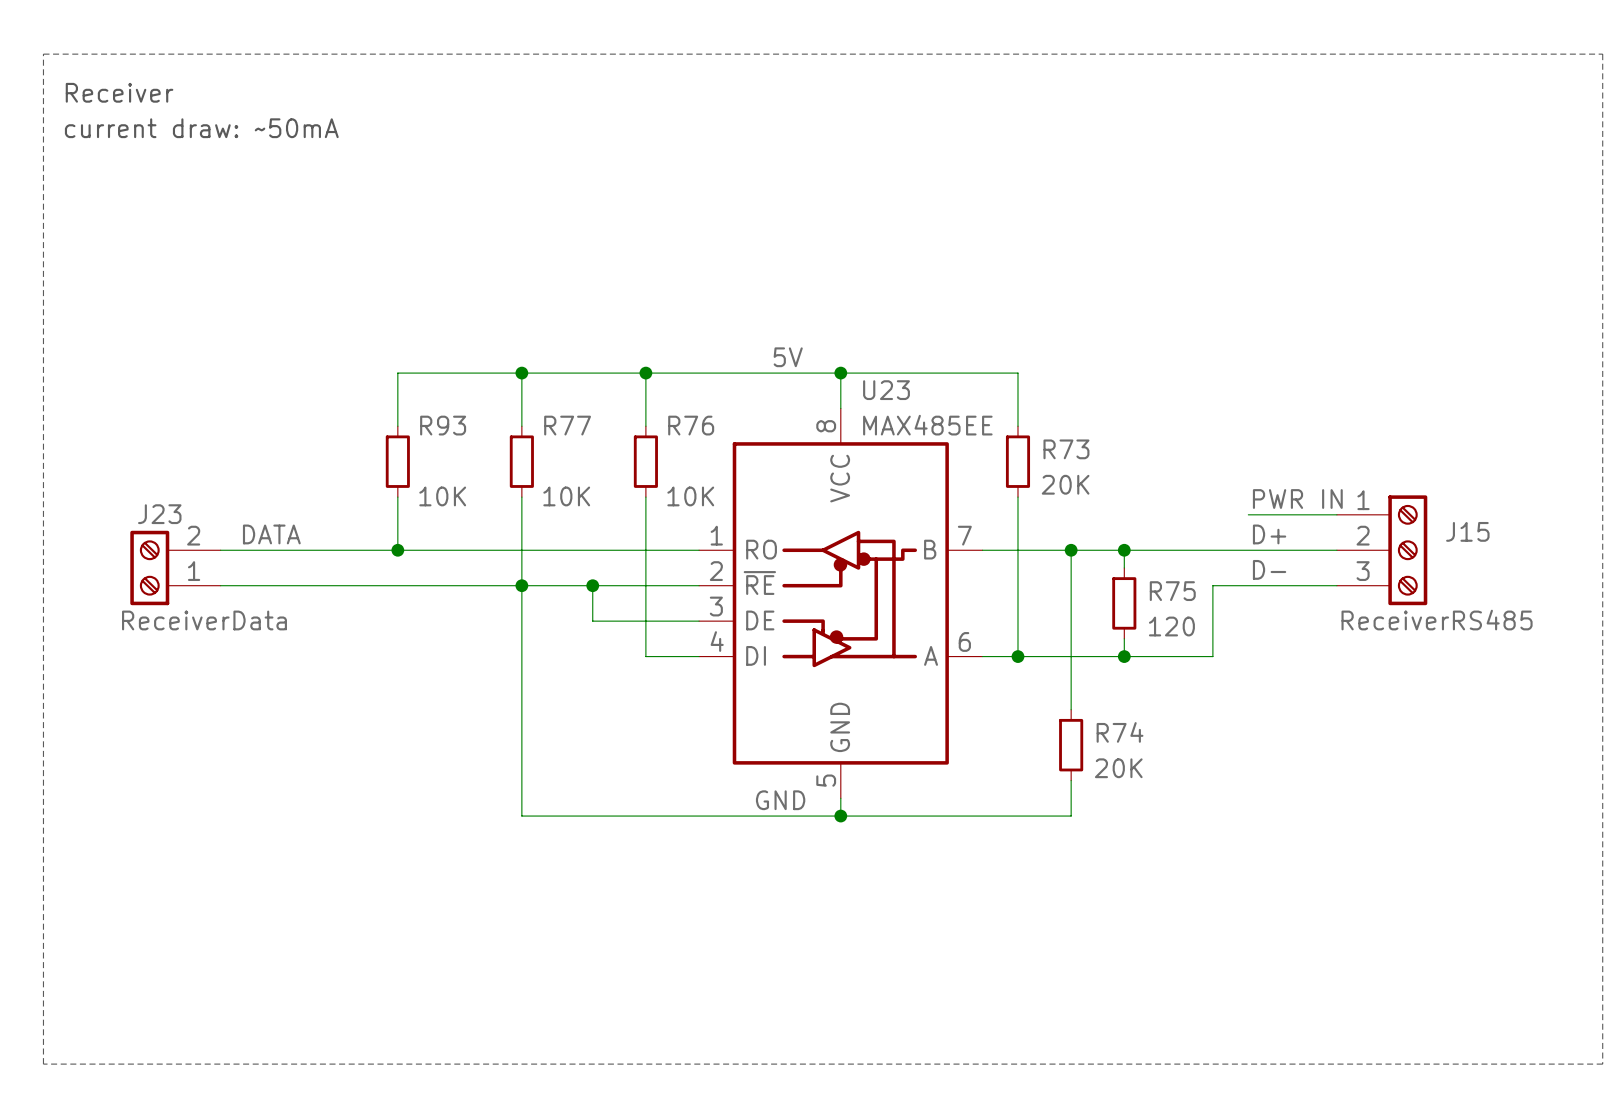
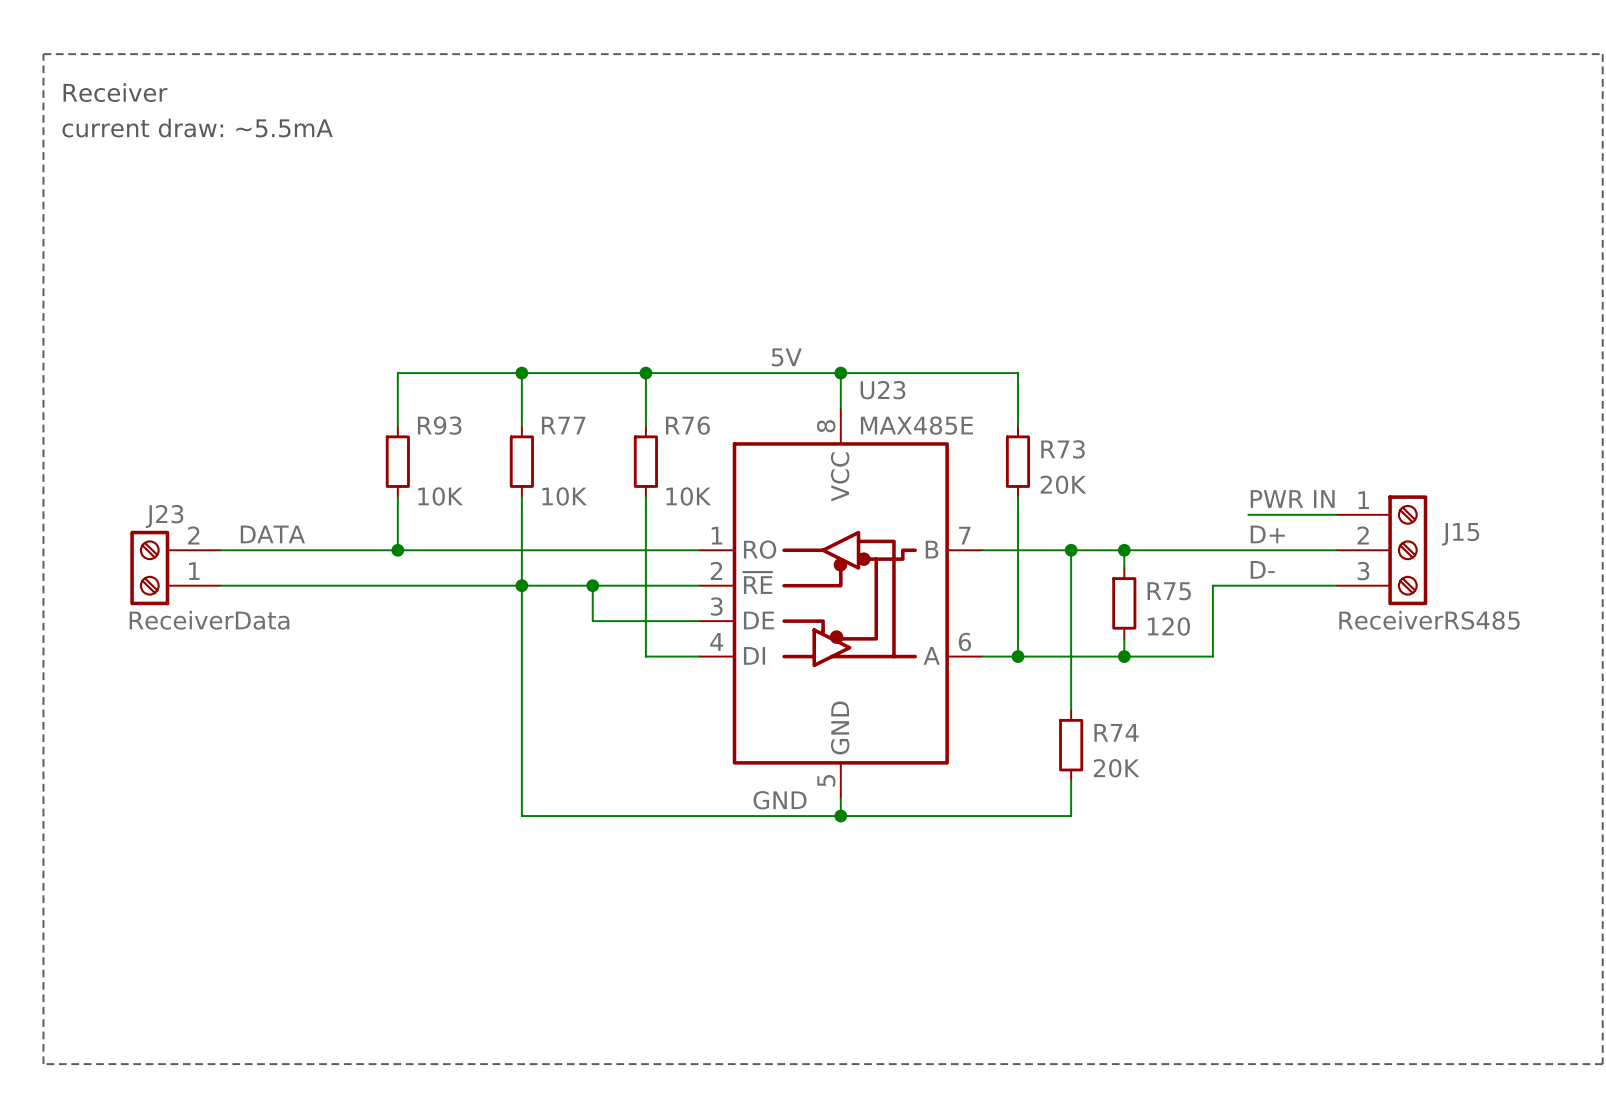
text: current draw: ~50mA (201, 128) -> current draw: ~5.5mA (197, 128)
U23 value: MAX485EE (927, 425) -> MAX485E (916, 425)

